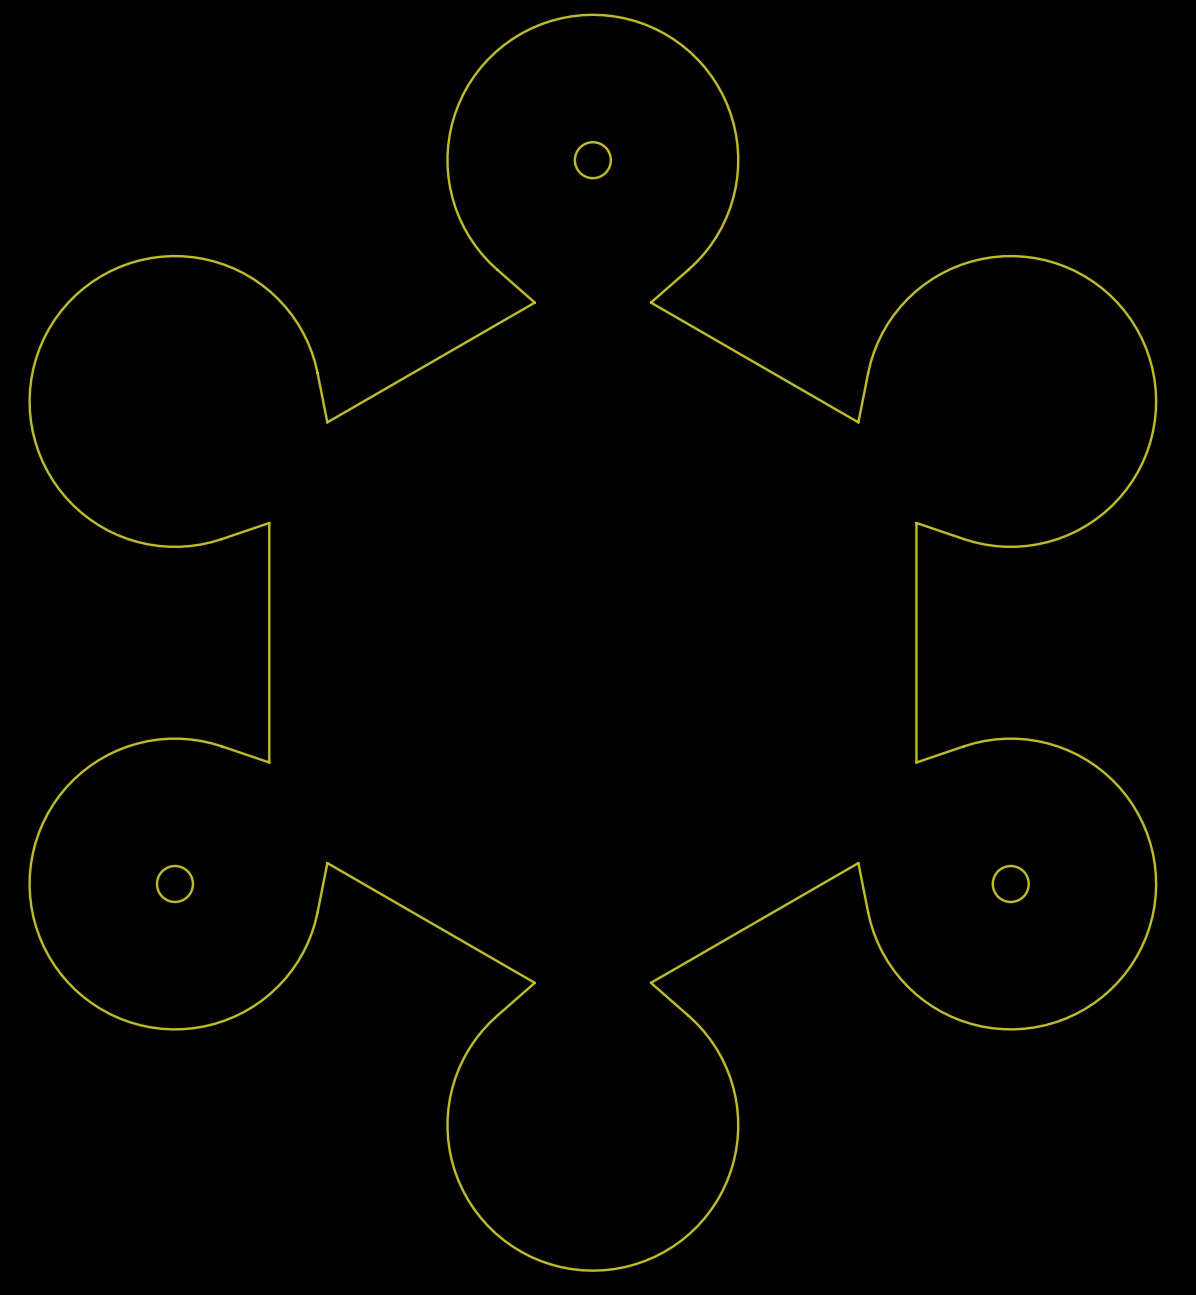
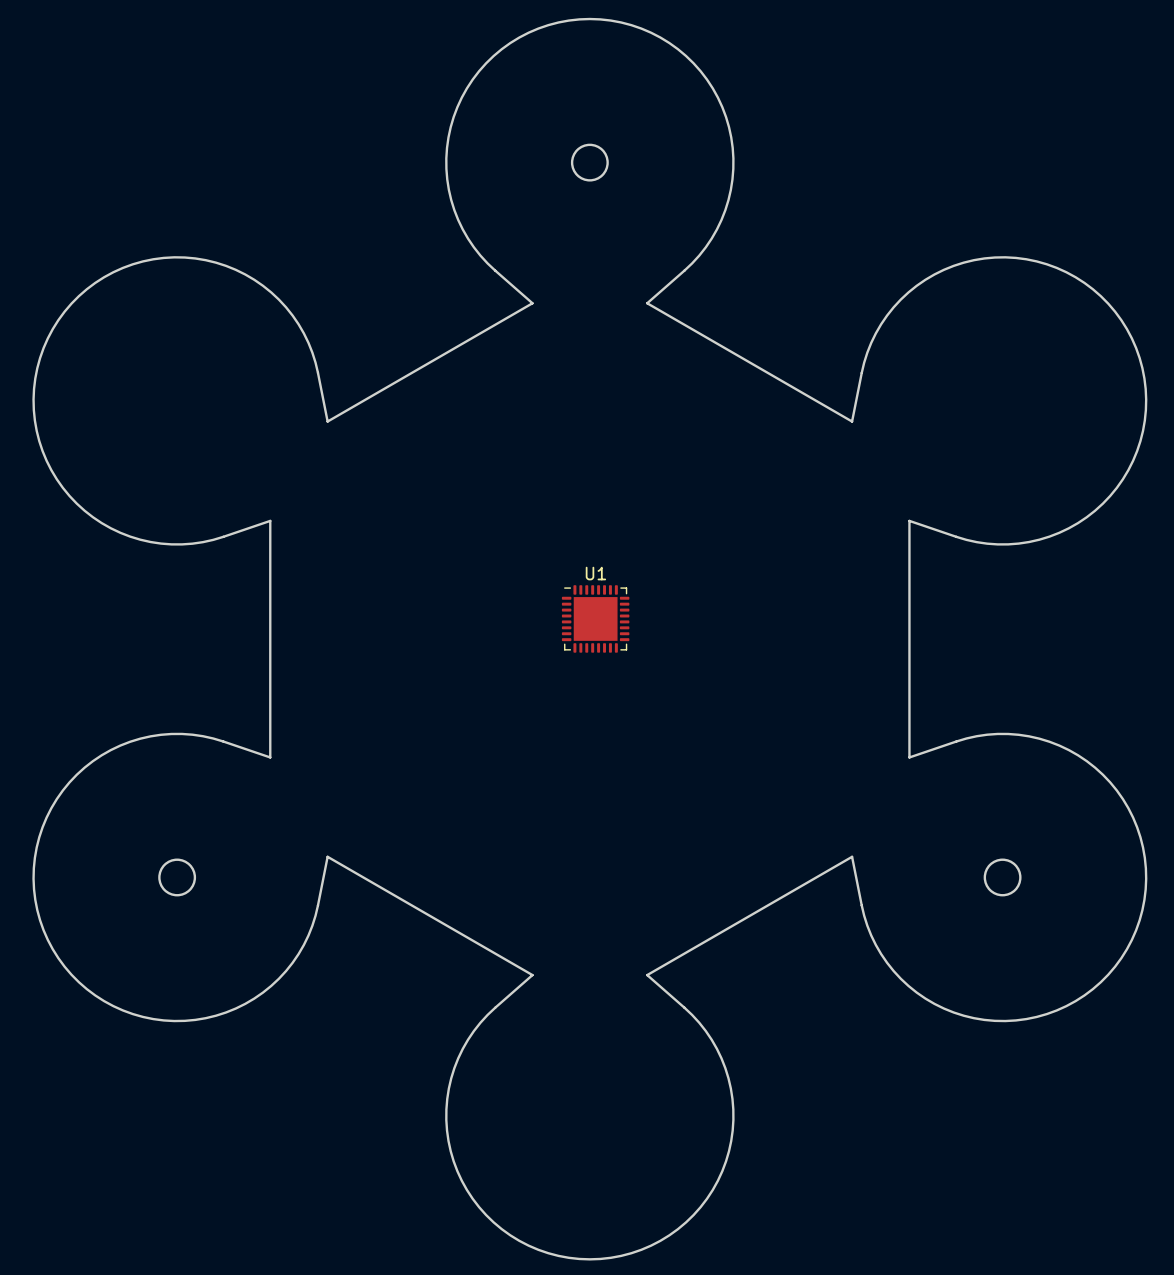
U1: none -> (595, 618)

